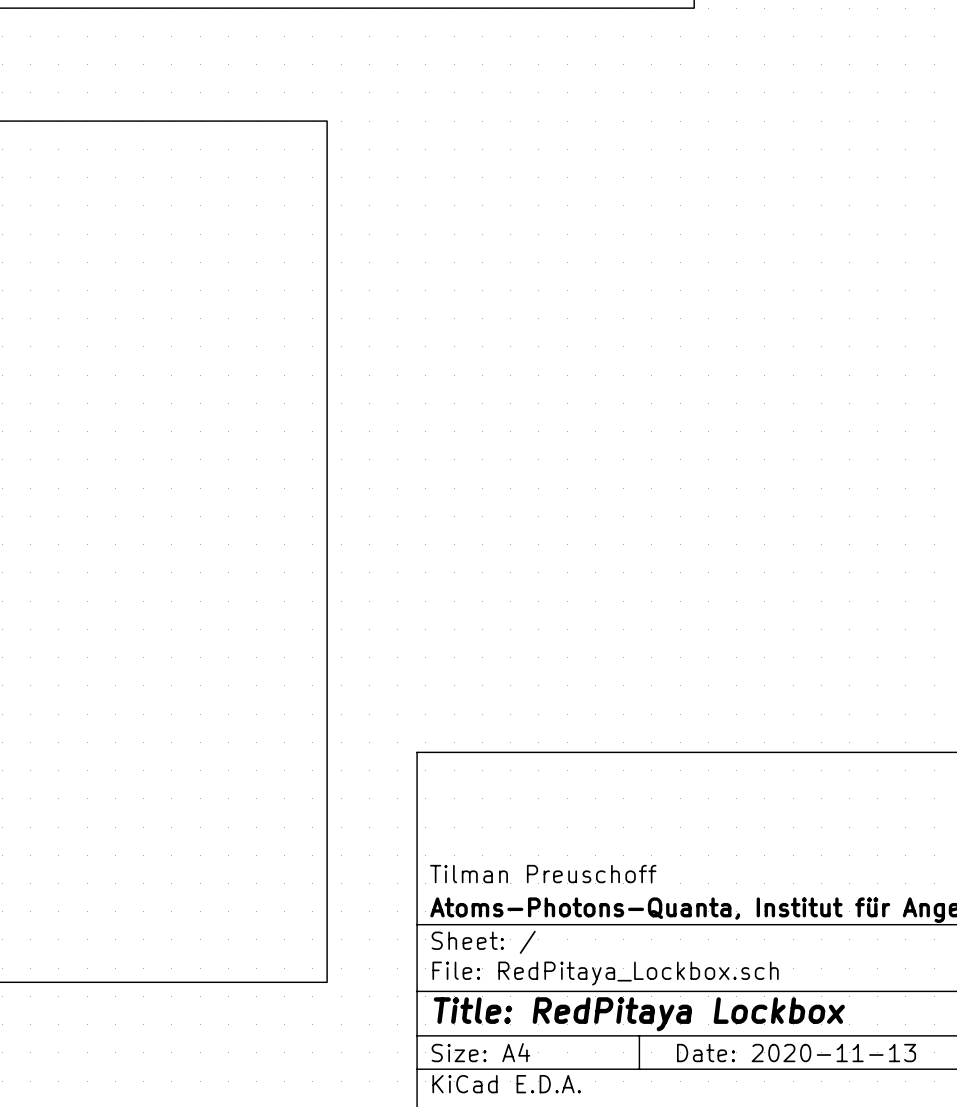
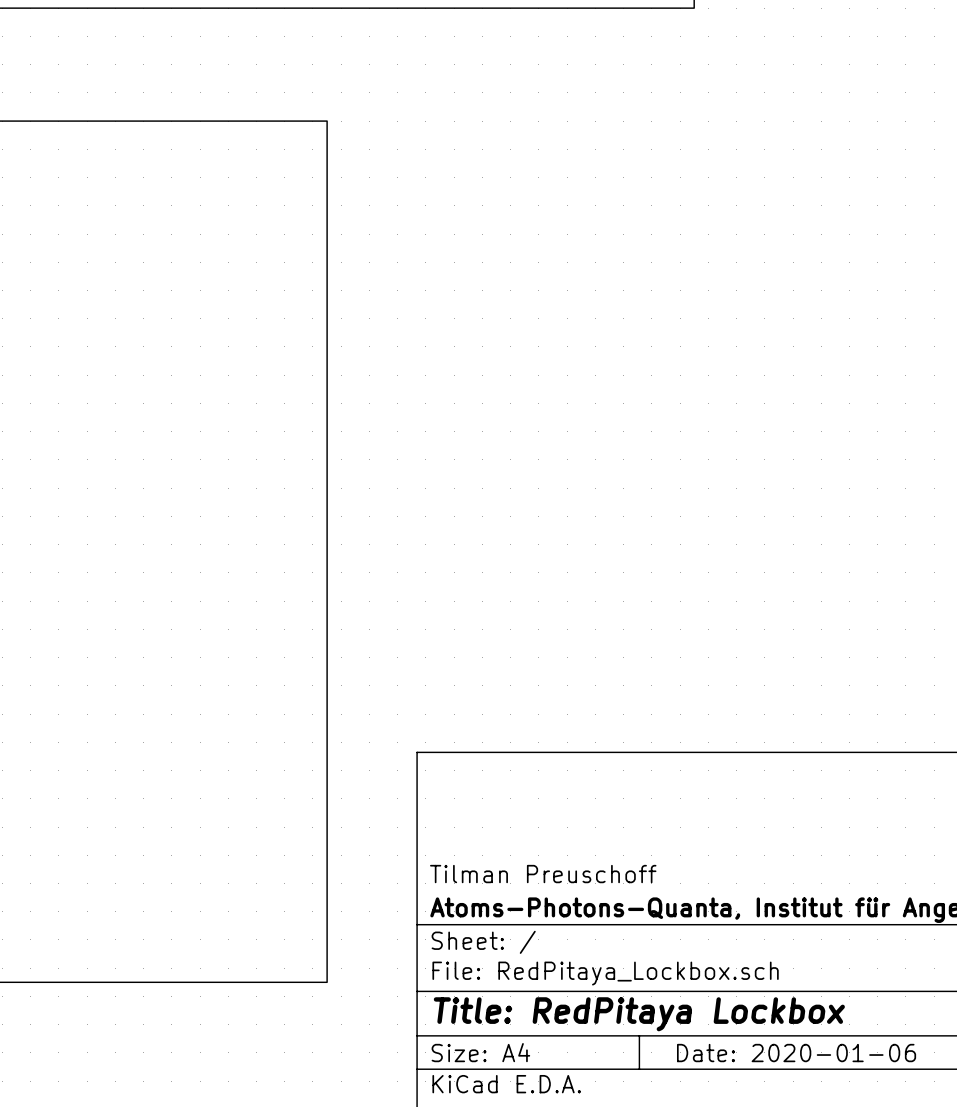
title block: Date: 2020-11-13 (796, 1053) -> Date: 2020-01-06 (796, 1053)

